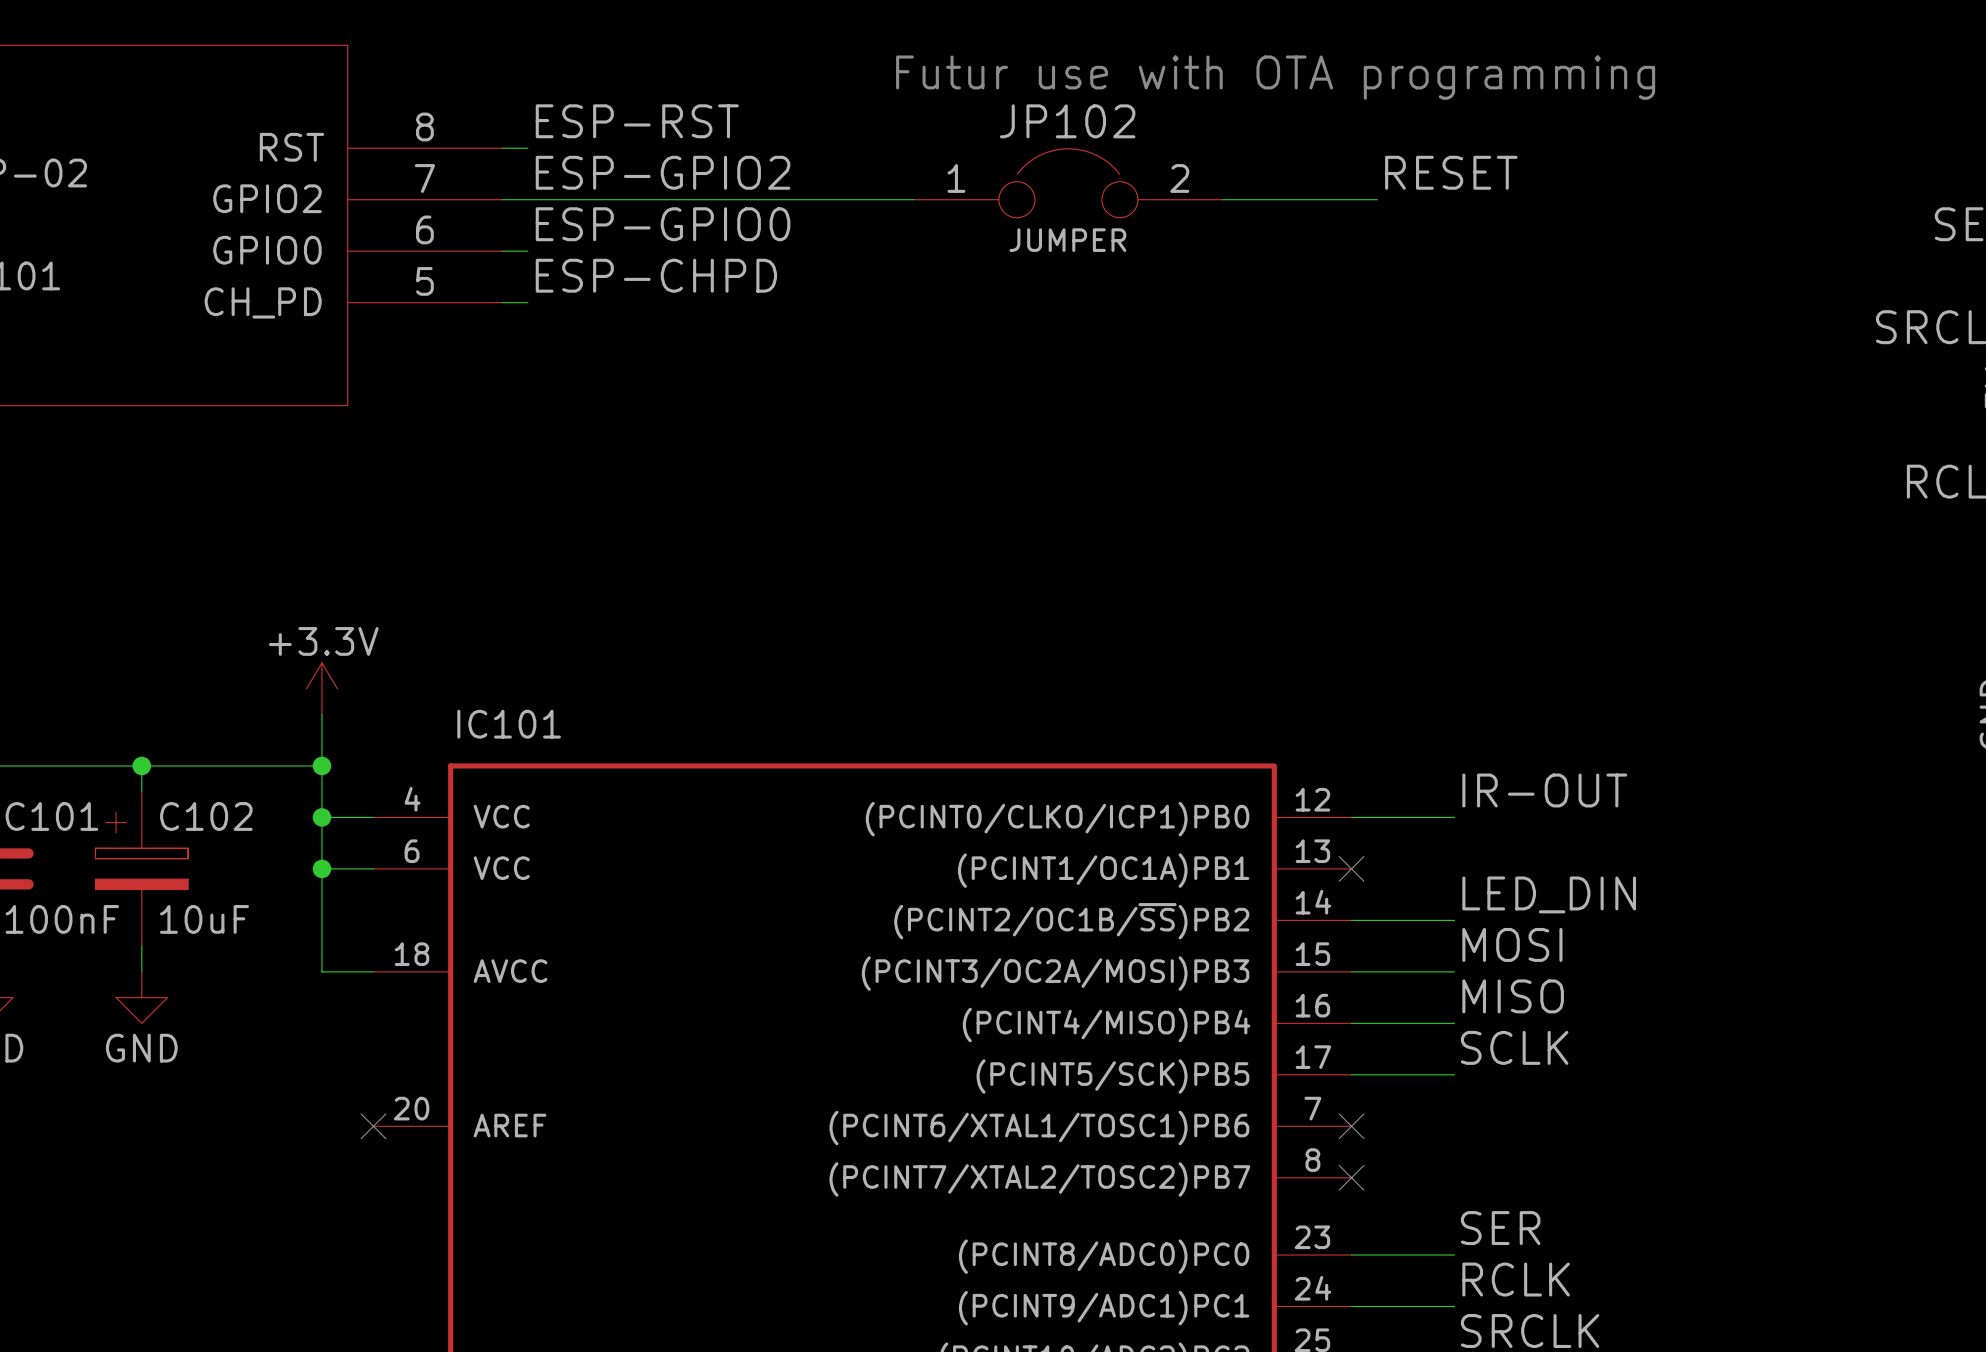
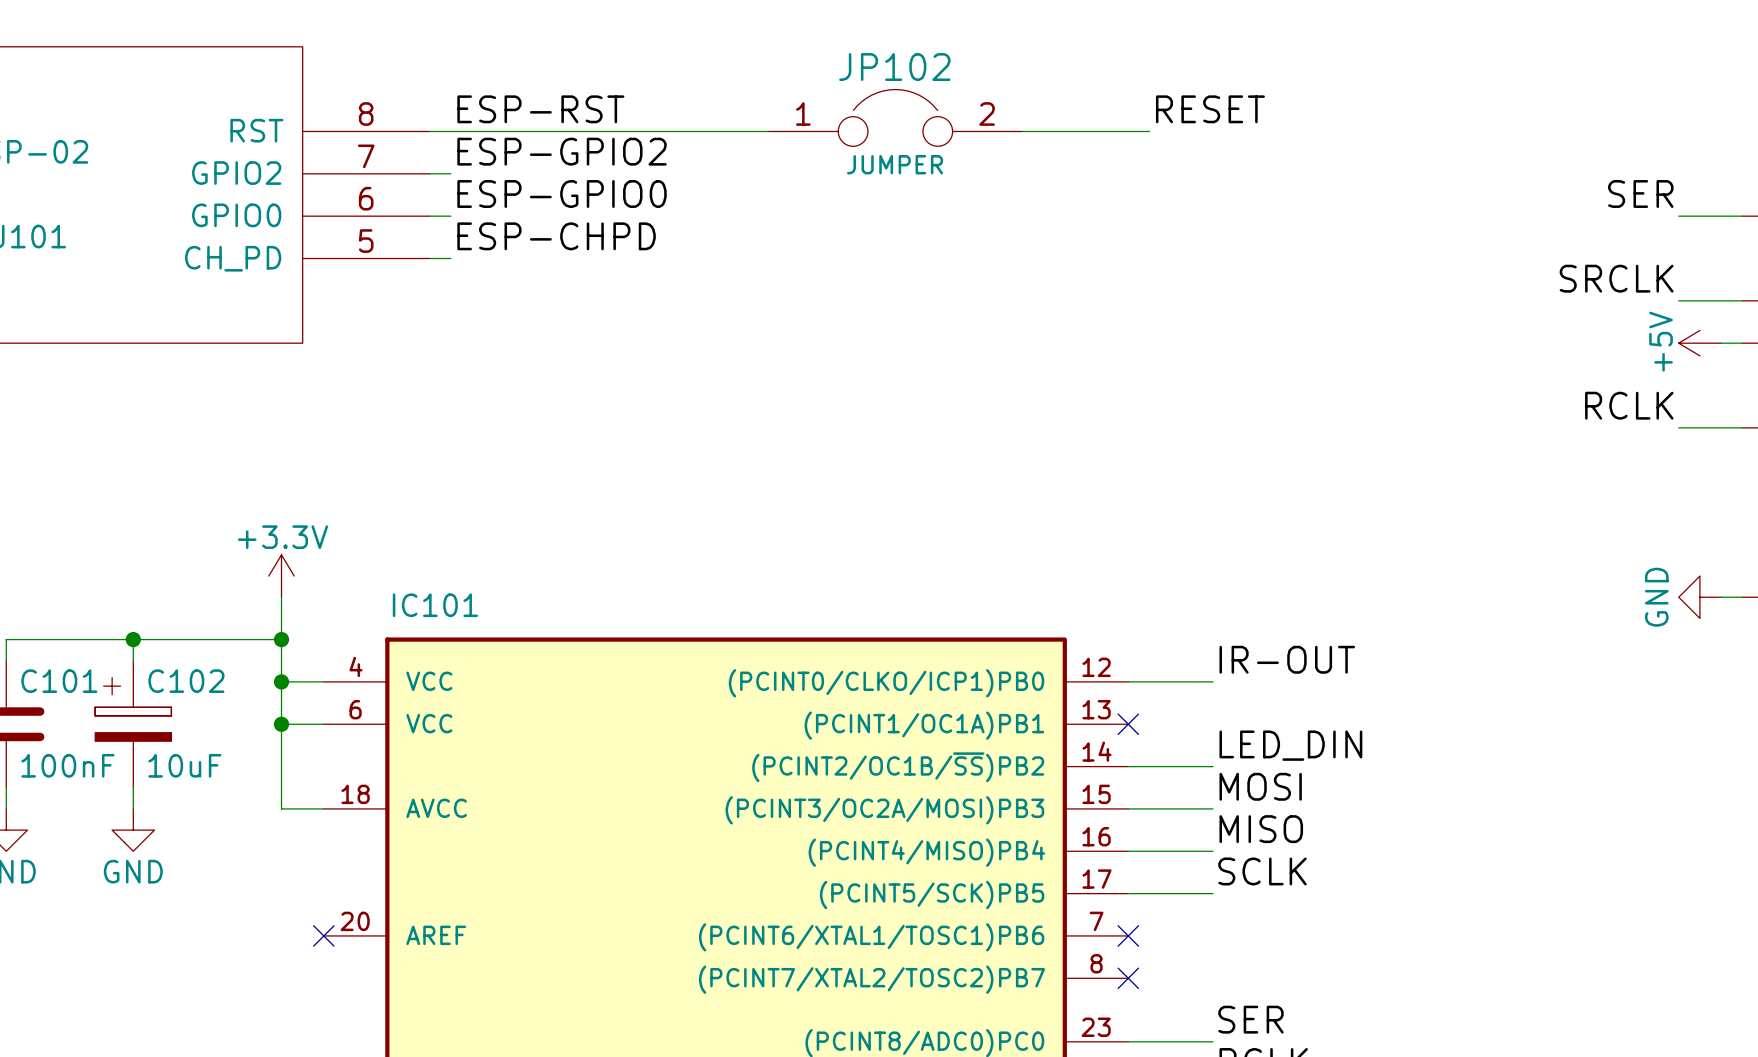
text: Futur use with OTA programming (1275, 77) -> none
label position: RESET (1451, 172) -> RESET (1210, 109)
JP102 position: (1068, 183) -> (895, 117)
wire: (527, 199) (913, 199) -> (450, 131) (768, 131)
wire: (1222, 199) (1377, 199) -> (1022, 131) (1149, 131)

